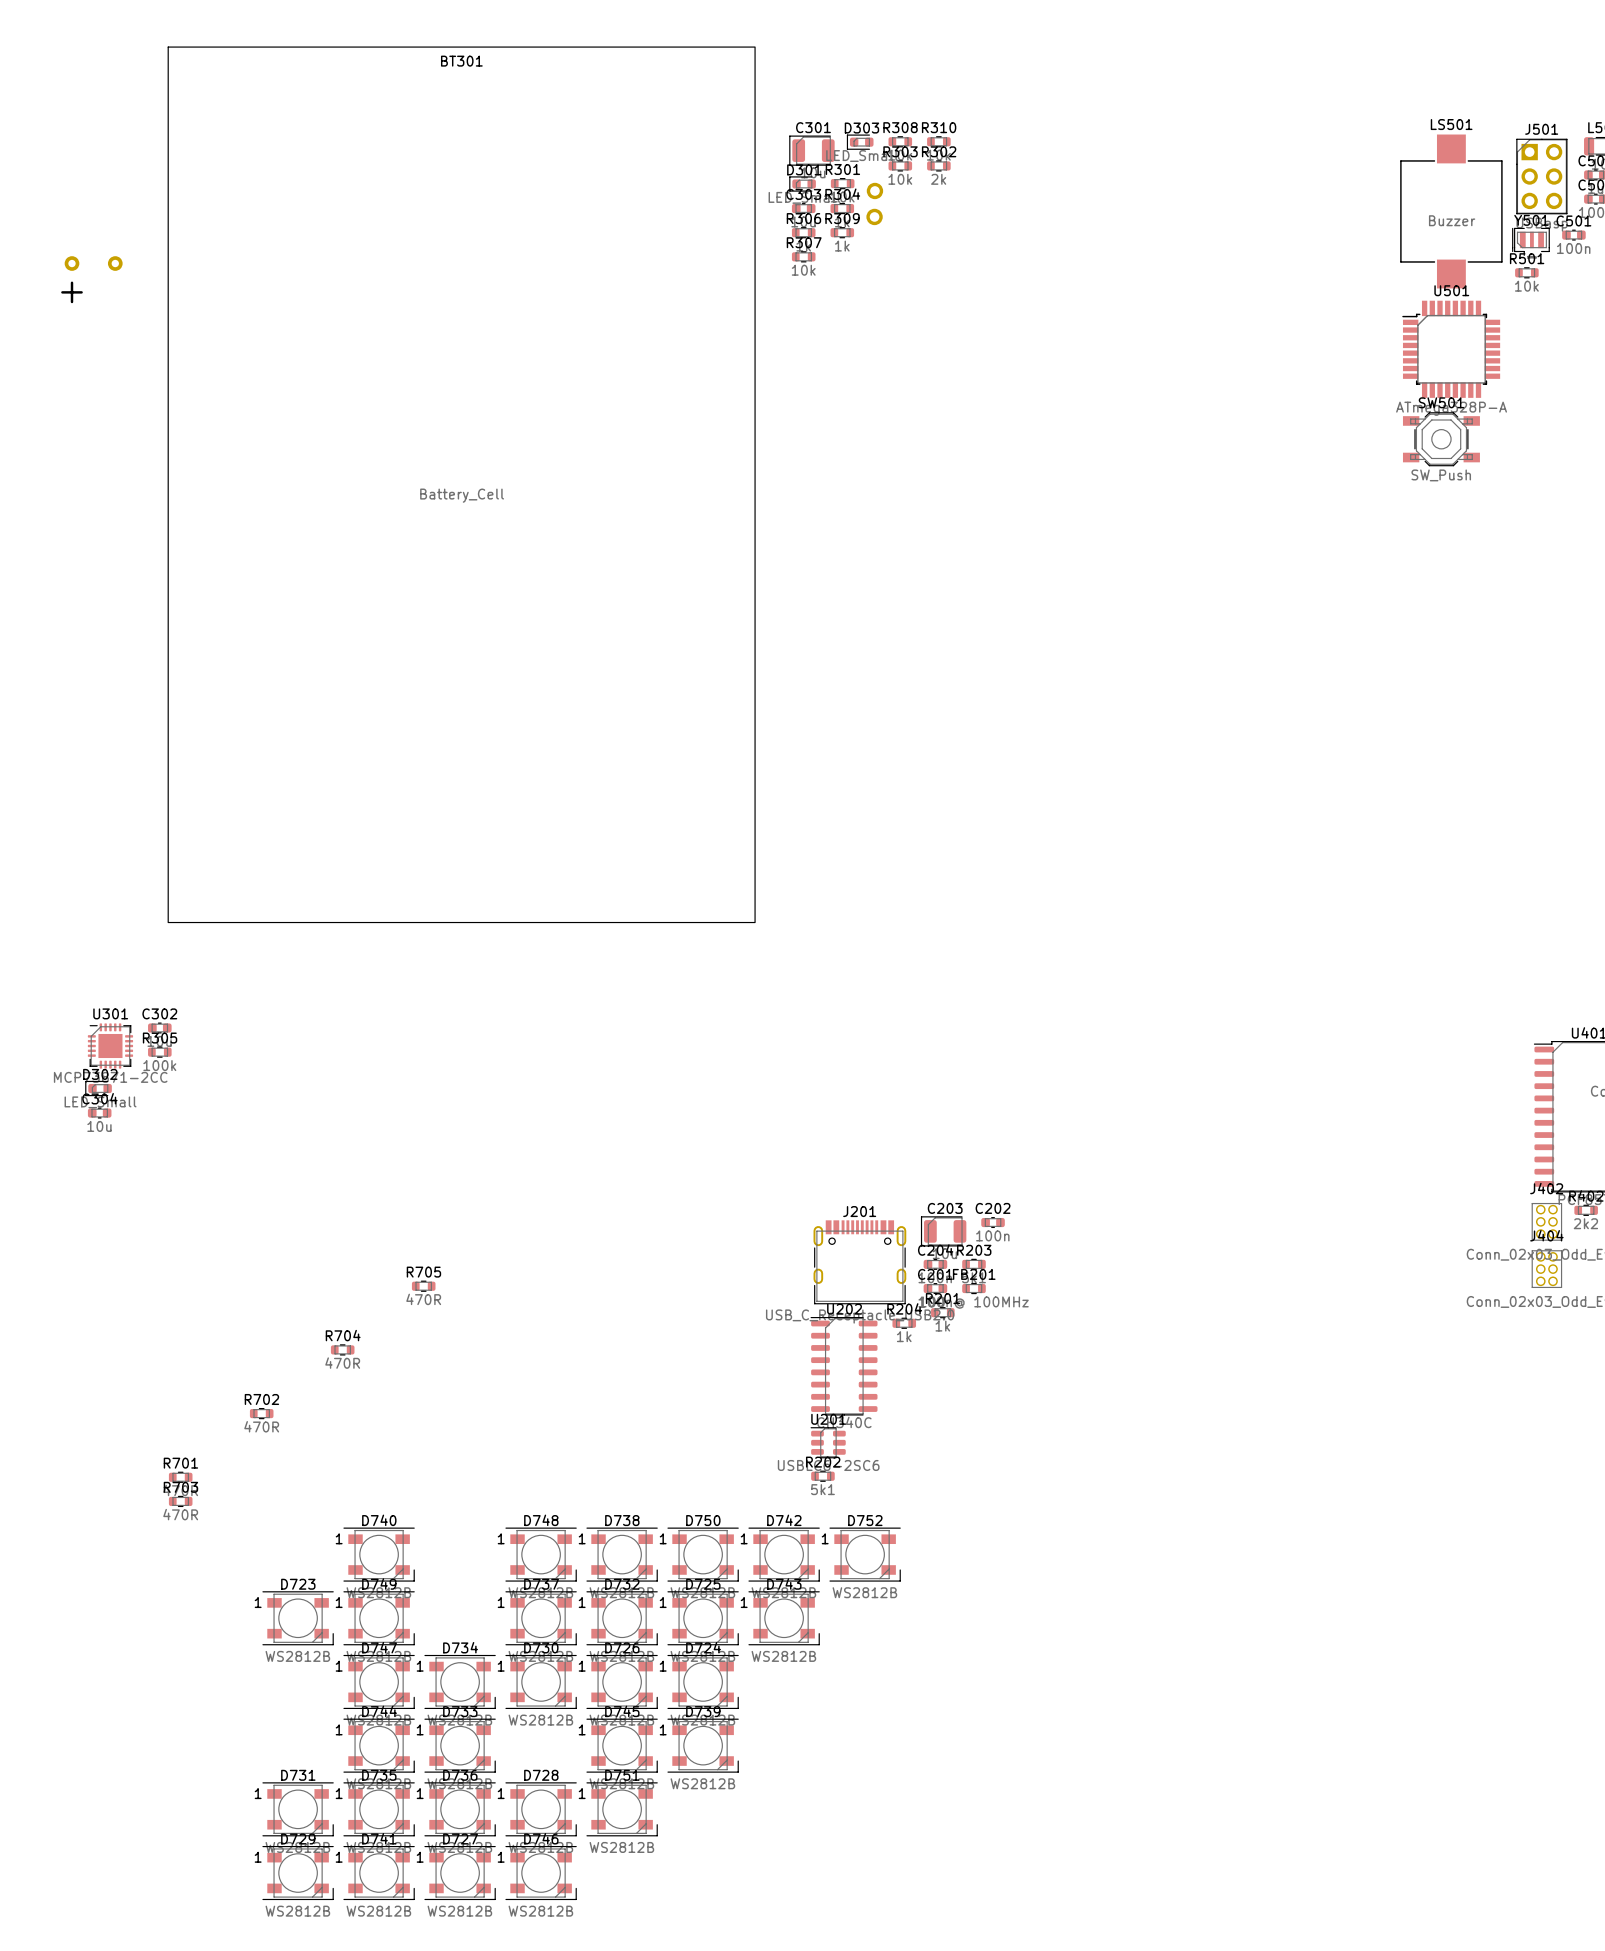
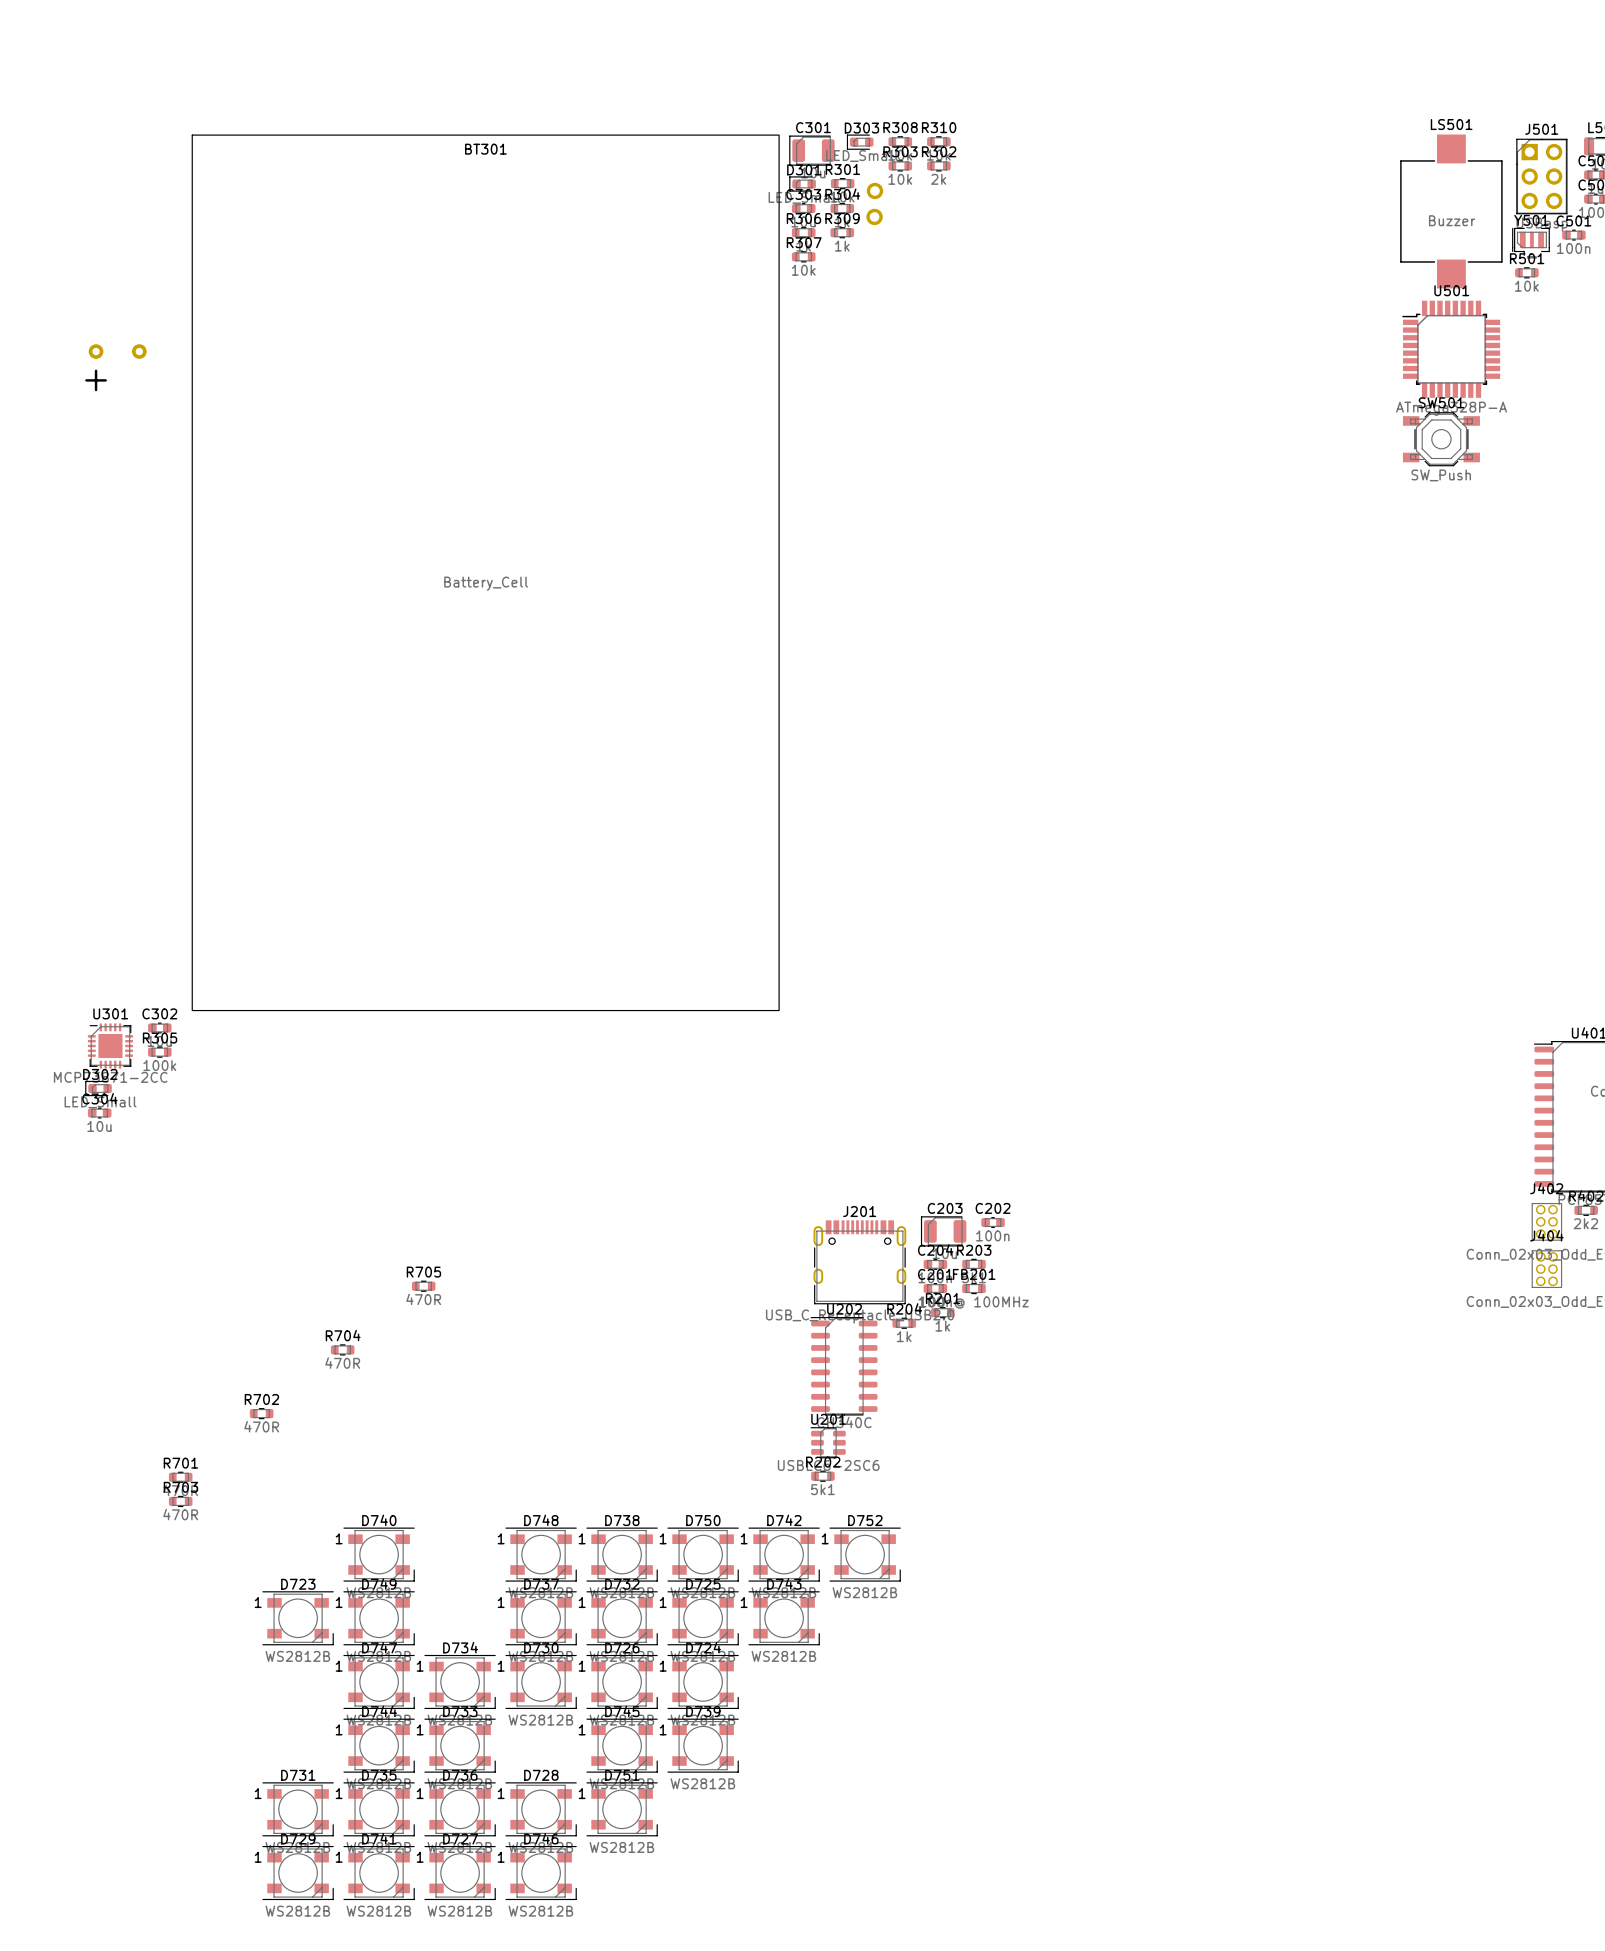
BT301 position: (408, 484) -> (432, 572)

